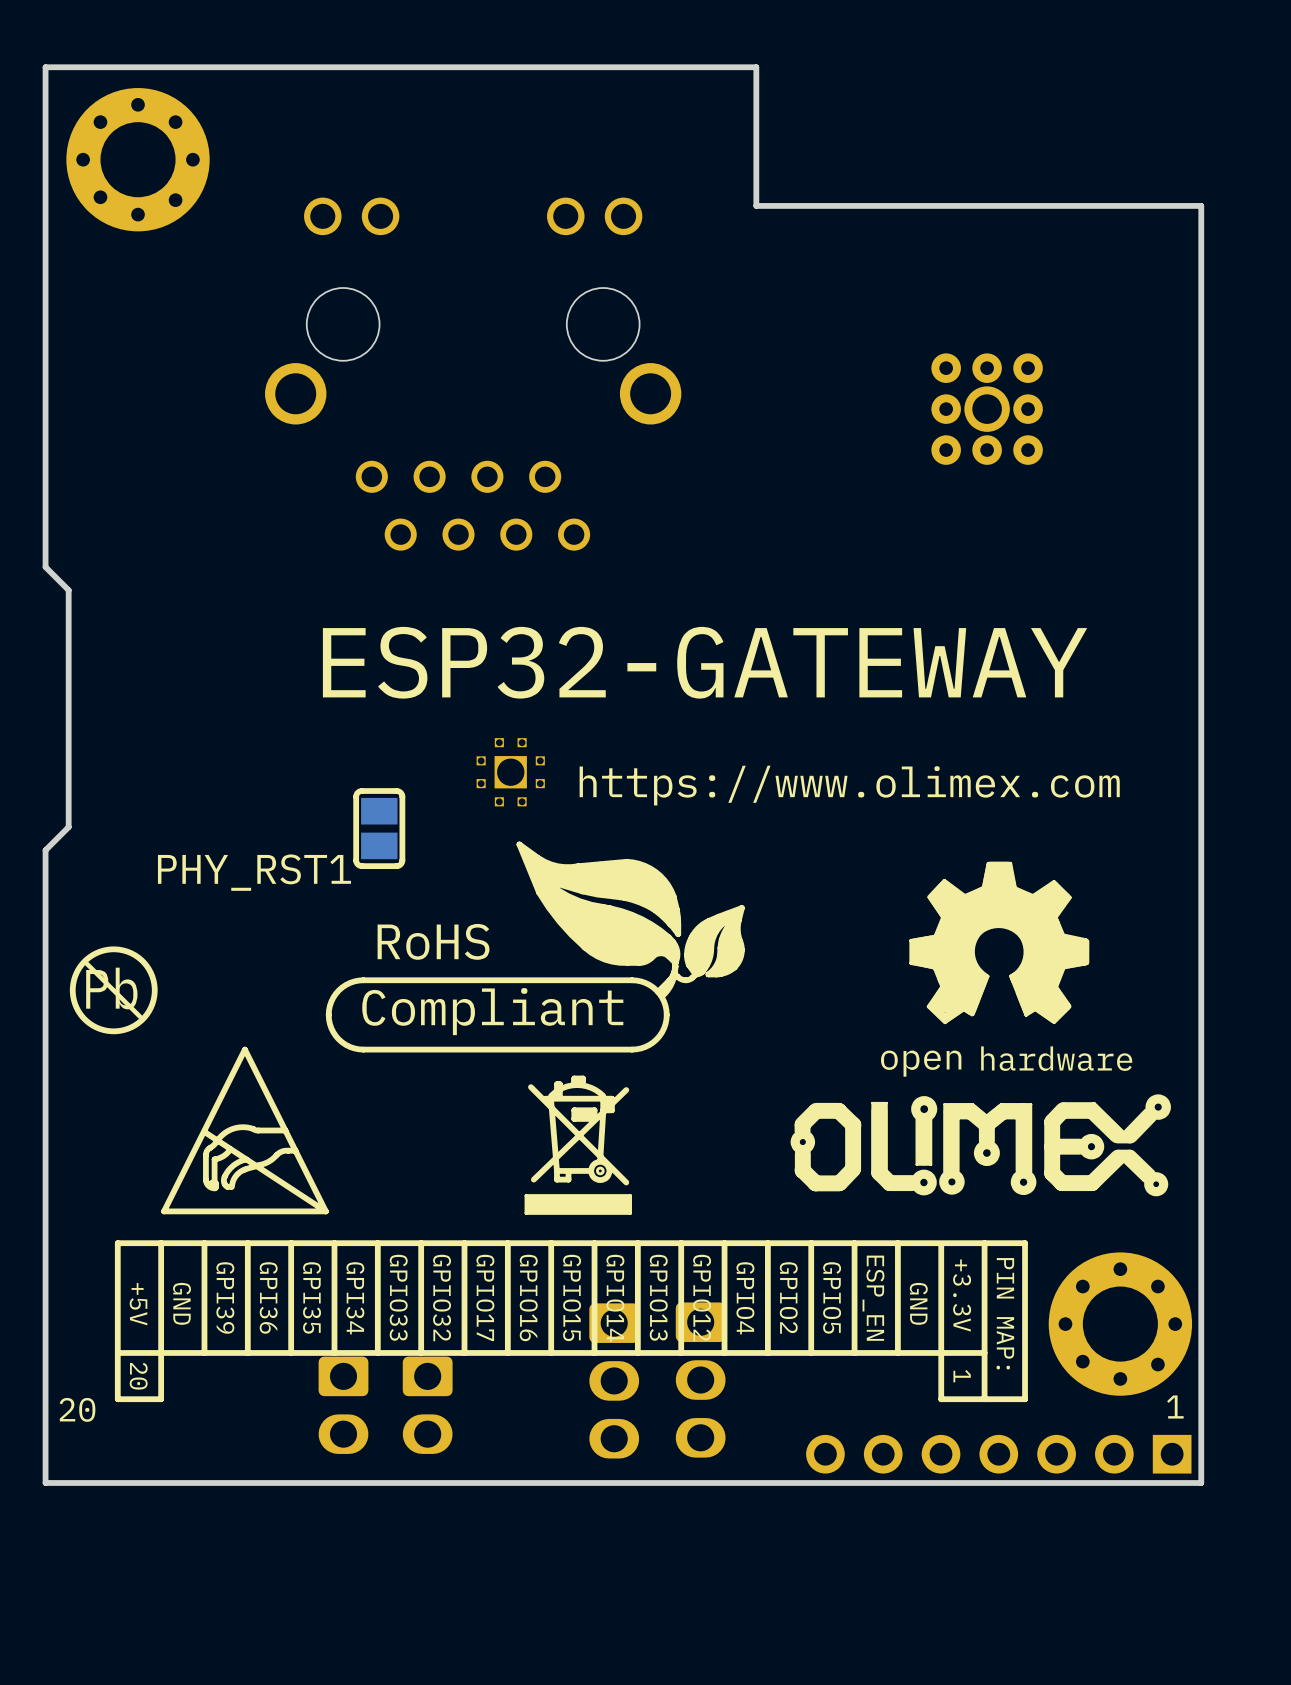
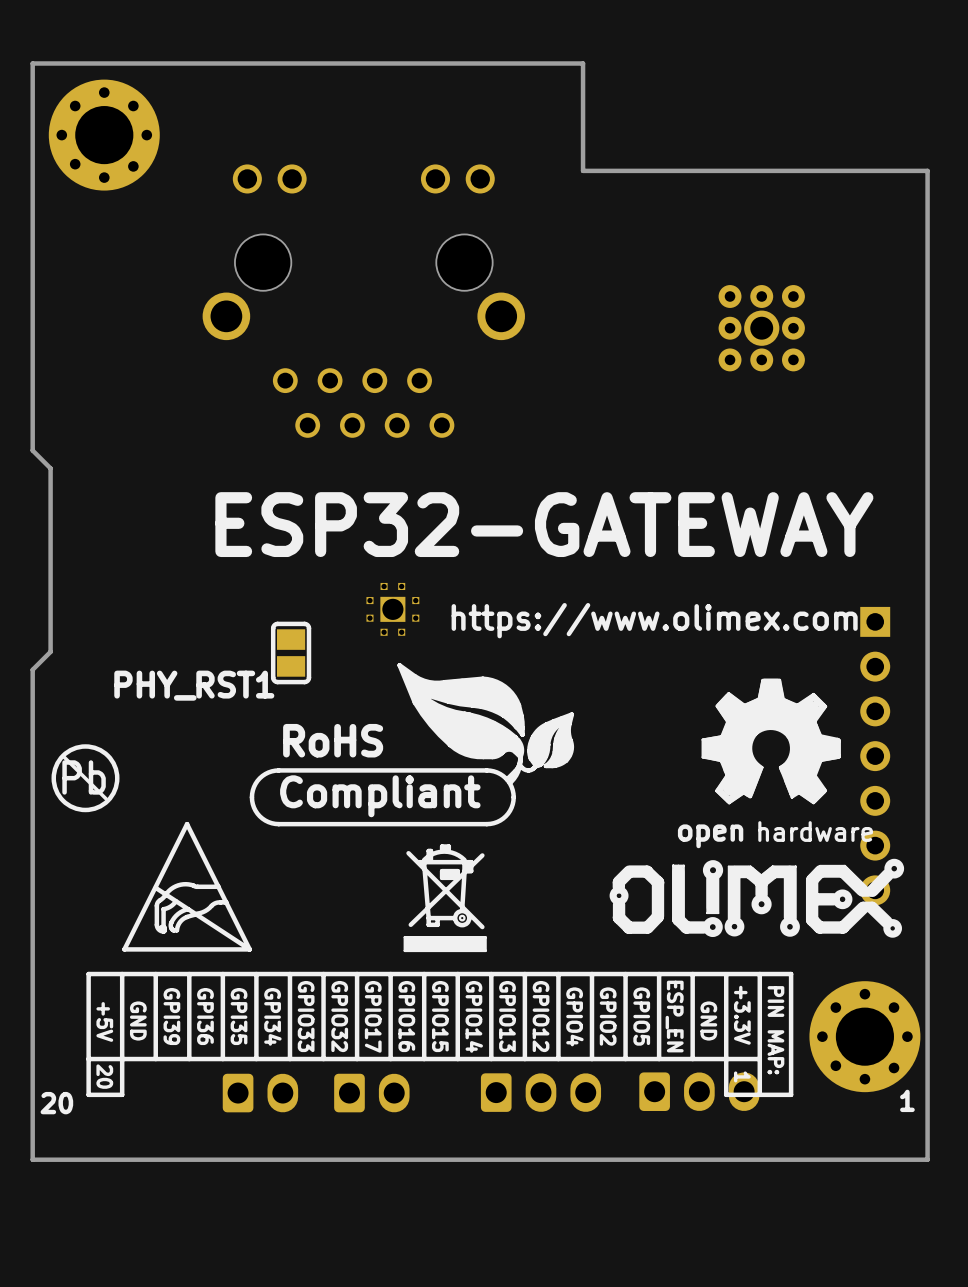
part rotation: 0° (614, 1380) -> 90° counterclockwise (699, 1091)
part position: (614, 1380) -> (699, 1091)
part rotation: 0° (700, 1380) -> 90° counterclockwise (540, 1092)
part rotation: 0° (343, 1405) -> 90° counterclockwise (260, 1093)
part rotation: 0° (427, 1405) -> 90° counterclockwise (371, 1093)
part rotation: 0° (998, 1454) -> 90° counterclockwise (875, 756)
part position: (998, 1454) -> (875, 756)

